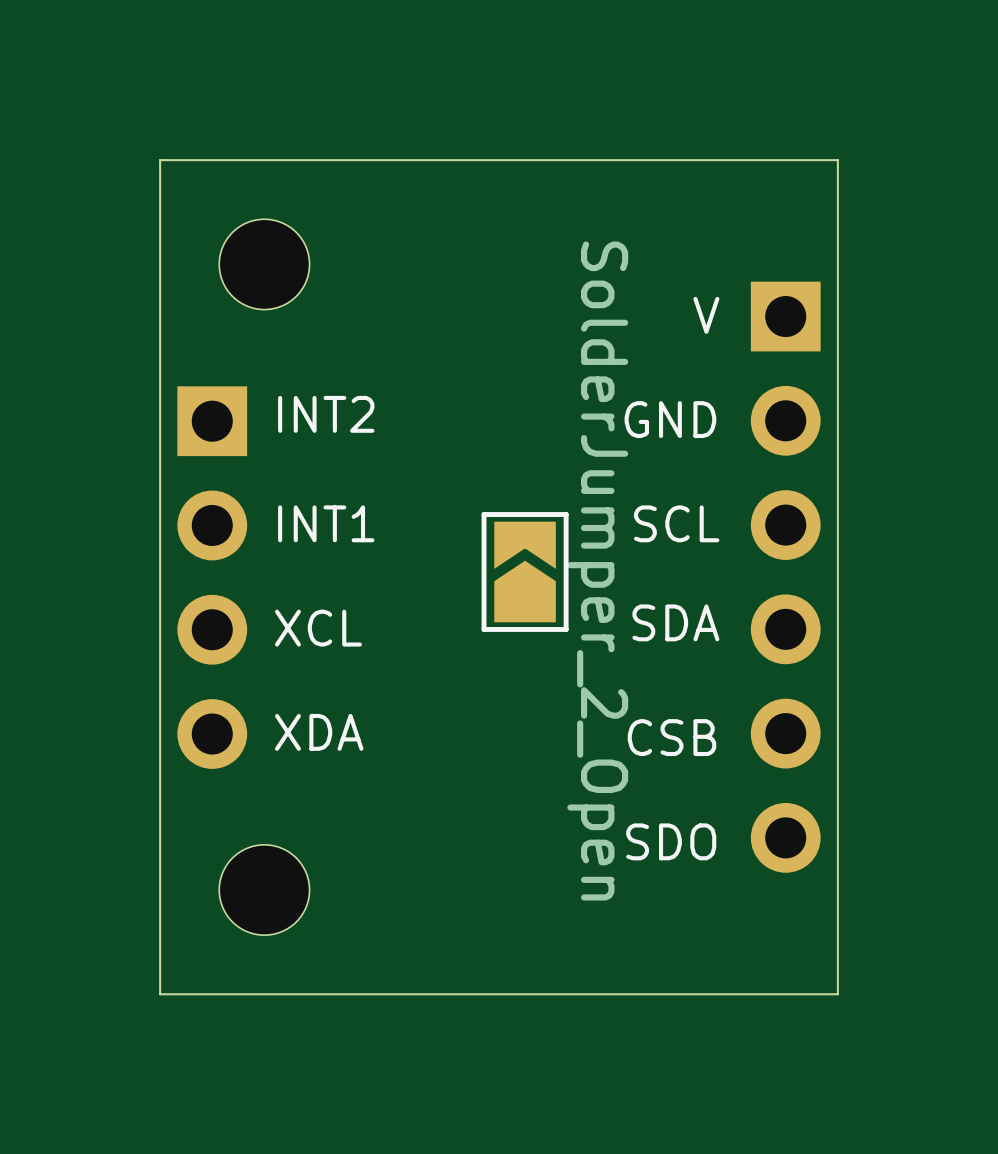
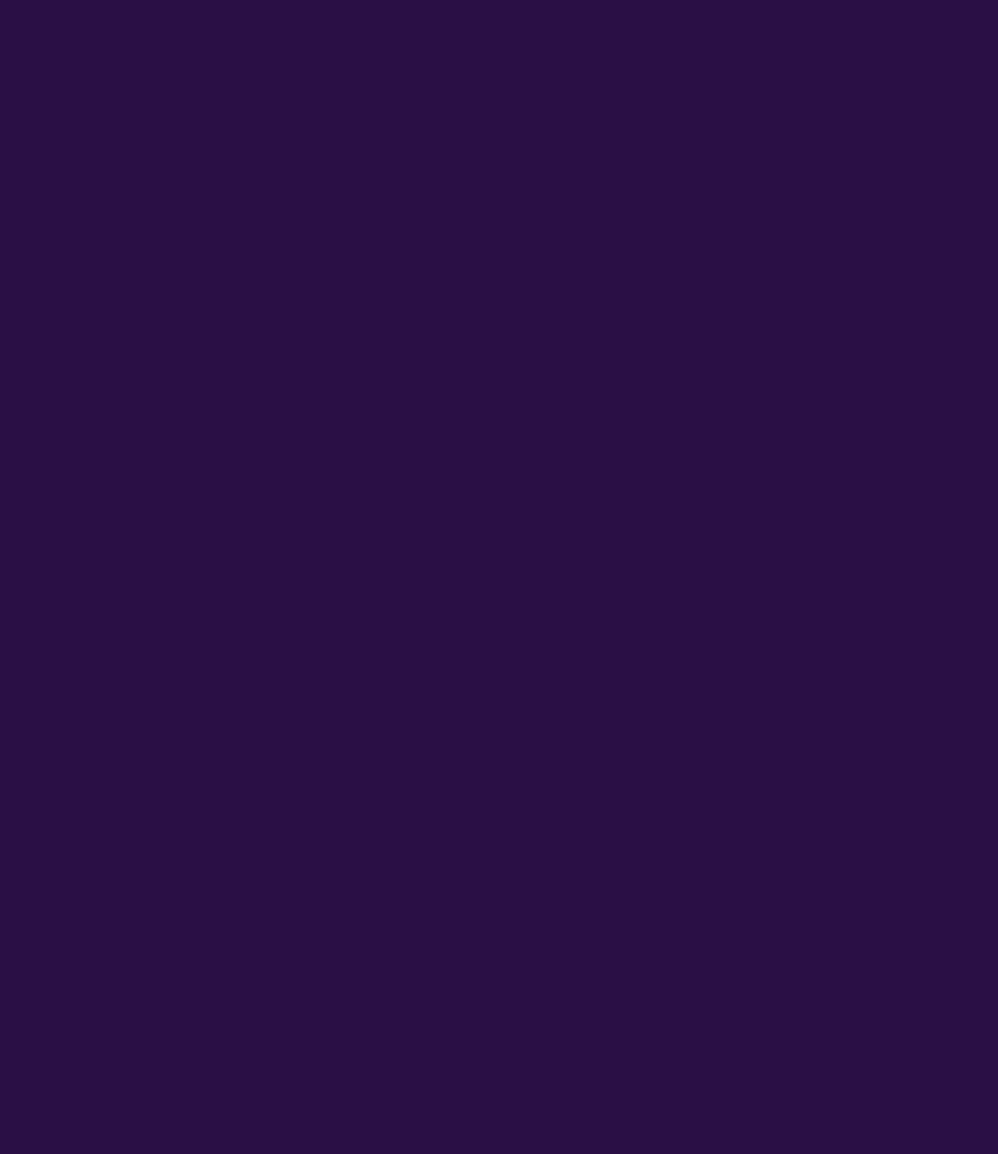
board edge: (837, 160) (837, 994) (160, 994) (160, 160) (837, 160) -> none
part: (264, 264) -> none
text: V (706, 315) -> none
text: INT2 (326, 414) -> none
text: GND (670, 419) -> none
text: INT1 (326, 523) -> none
text: SCL (676, 523) -> none
part: SolderJumper_2_Open (525, 571) -> none
part: (212, 577) -> none
part: (785, 577) -> none
text: SDA (675, 622) -> none
text: XCL (318, 628) -> none
text: XDA (319, 732) -> none
text: CSB (671, 737) -> none
text: SDO (671, 841) -> none
part: (264, 890) -> none

